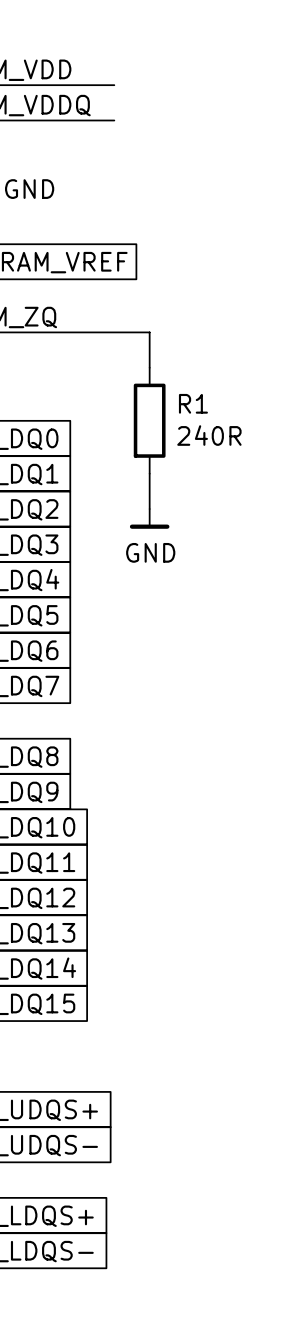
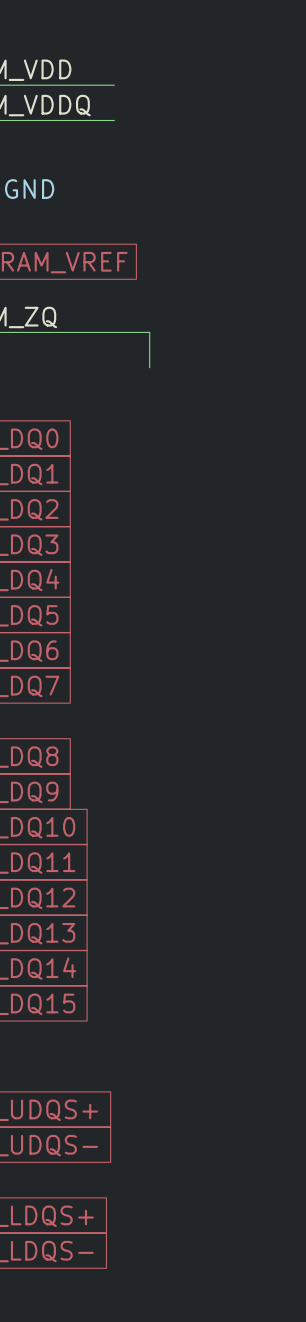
R1: 240R (149, 420) -> none
wire: (149, 473) (149, 509) -> none
power symbol: GND (149, 518) -> none

